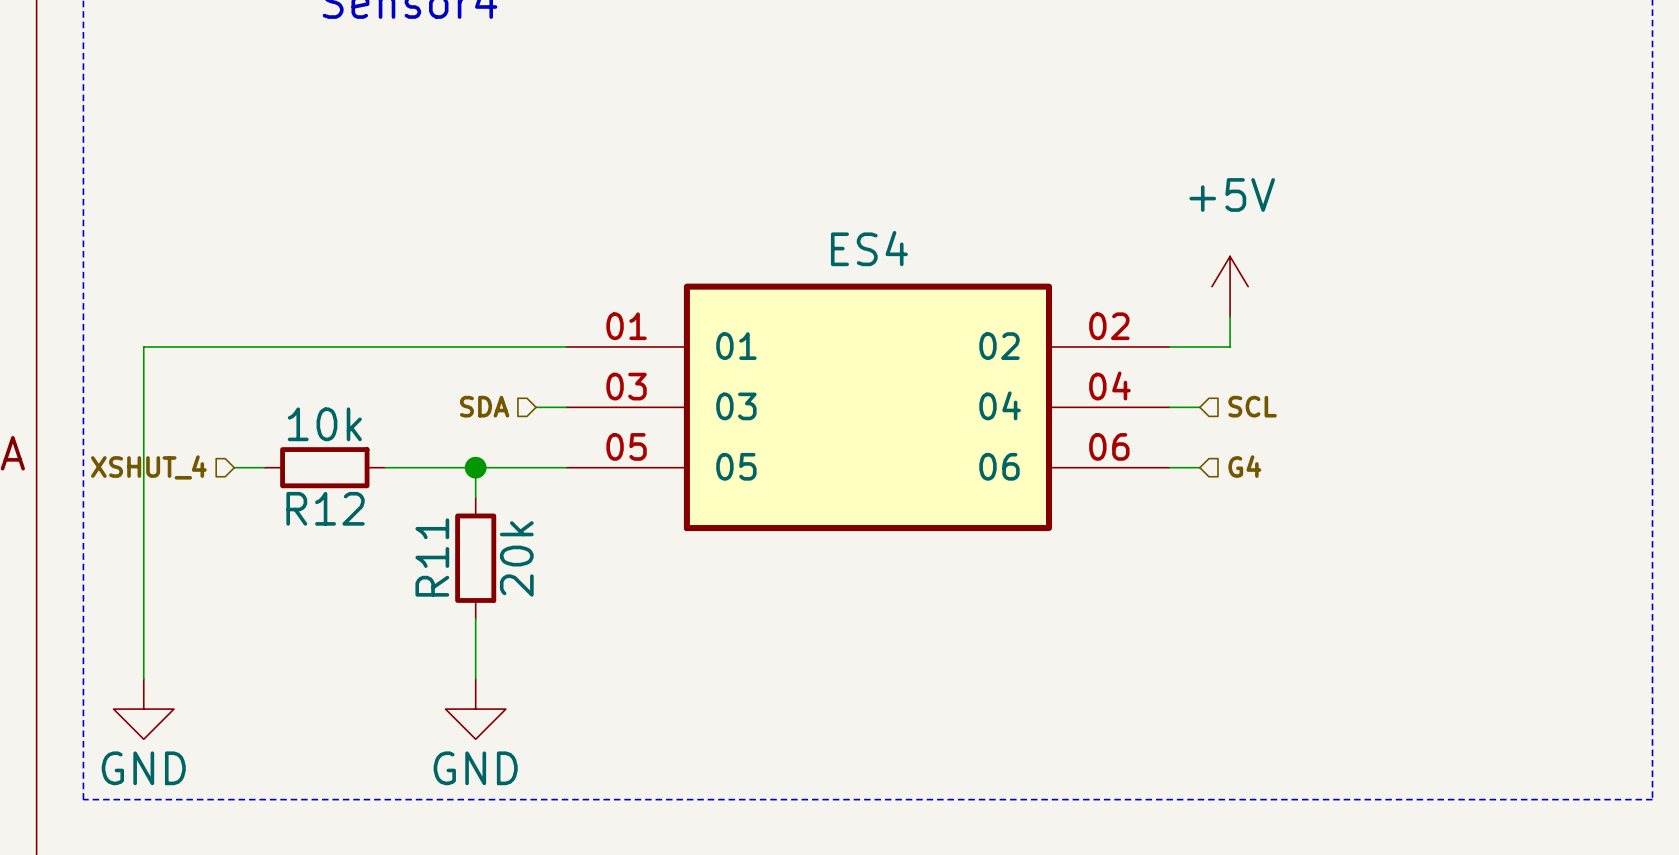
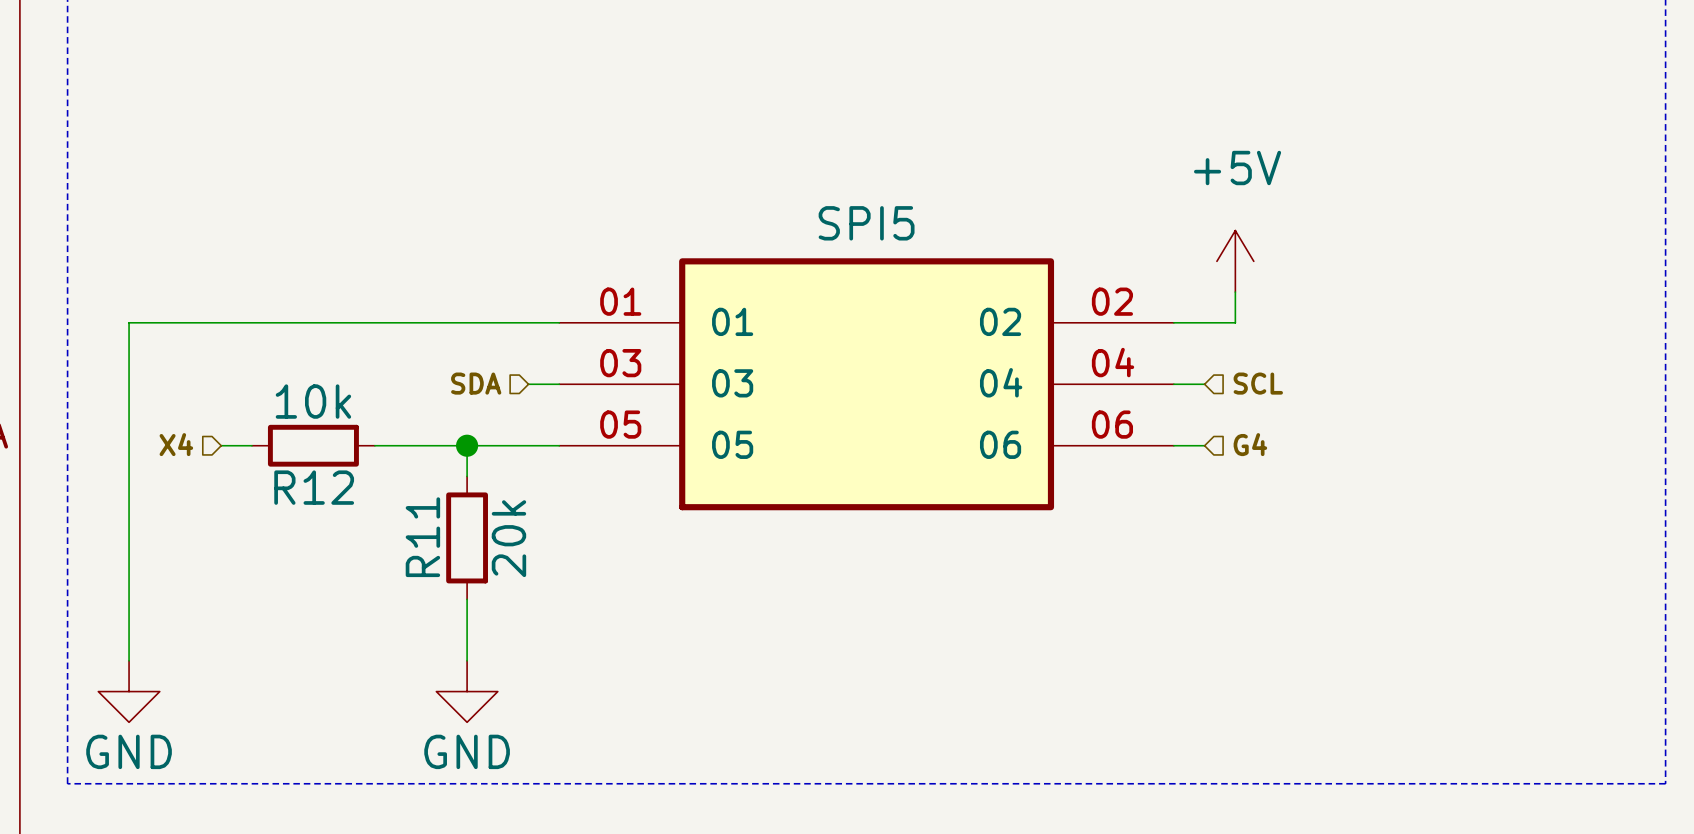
ES4 name: ES4 (869, 248) -> SPI5 (866, 223)
hierarchical label: XSHUT_4 (148, 467) -> X4 (176, 444)

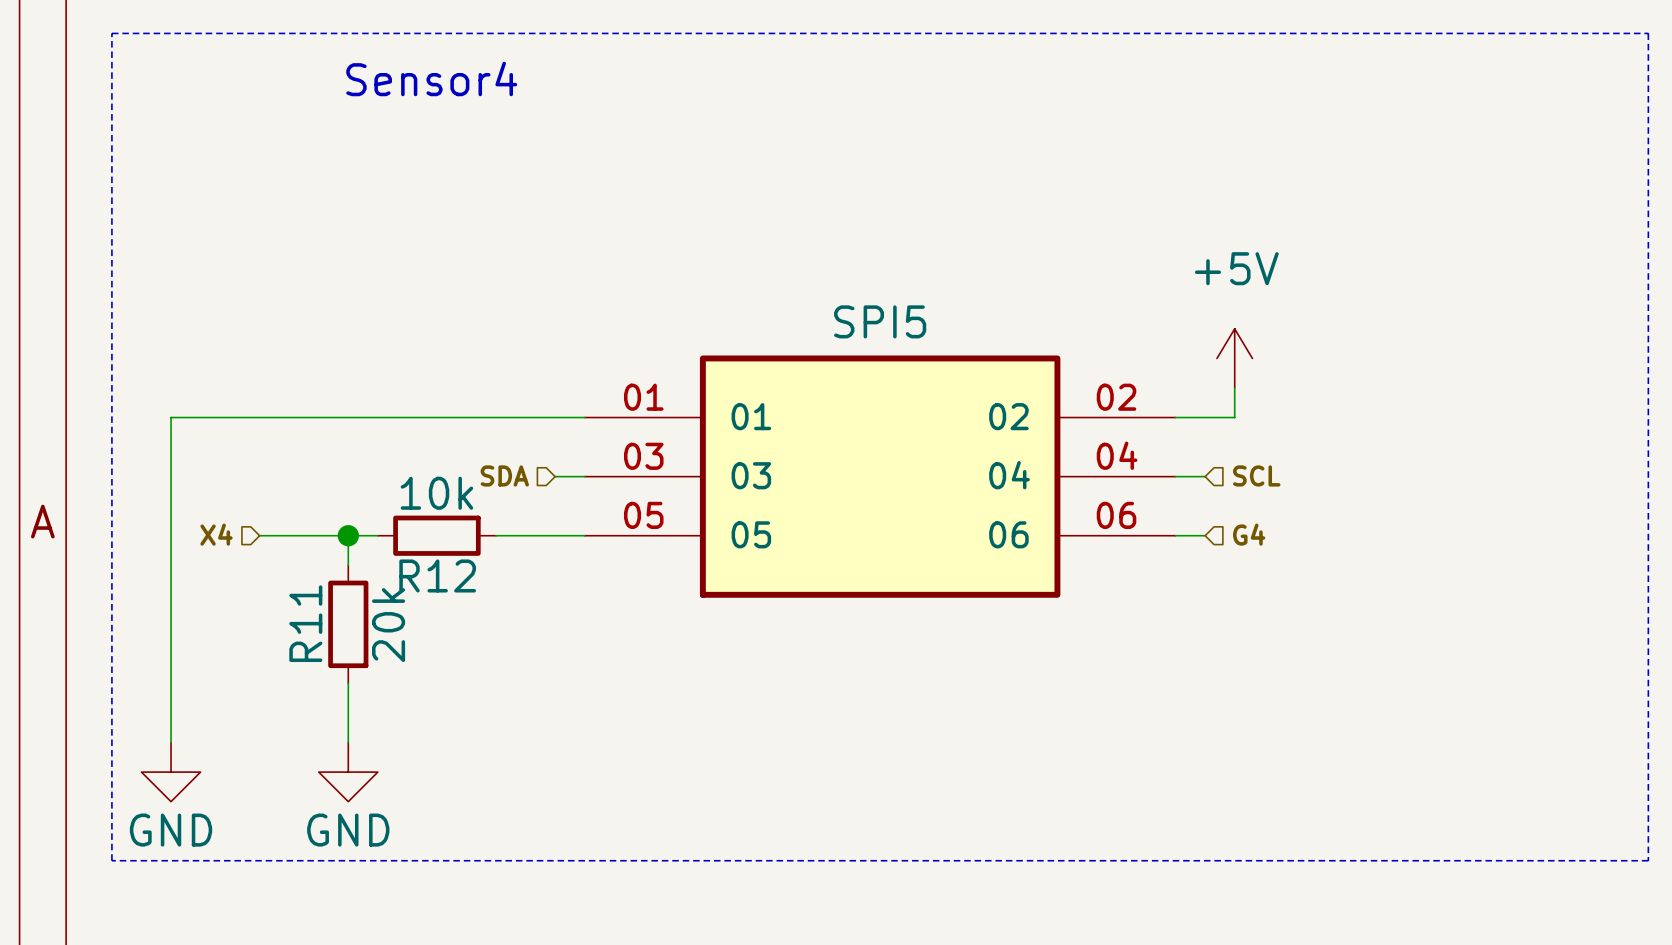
wire: none -> (289, 535) (377, 535)
wire: none -> (348, 535) (348, 565)
junction: none -> (348, 535)
R12 position: (313, 445) -> (436, 535)
wire: (374, 445) (467, 445) (467, 476) -> none
junction: (467, 445) -> none
R11 position: (467, 537) -> (348, 624)
wire: (467, 599) (467, 660) -> (348, 683) (348, 742)
power symbol position: GND (467, 691) -> GND (348, 772)

